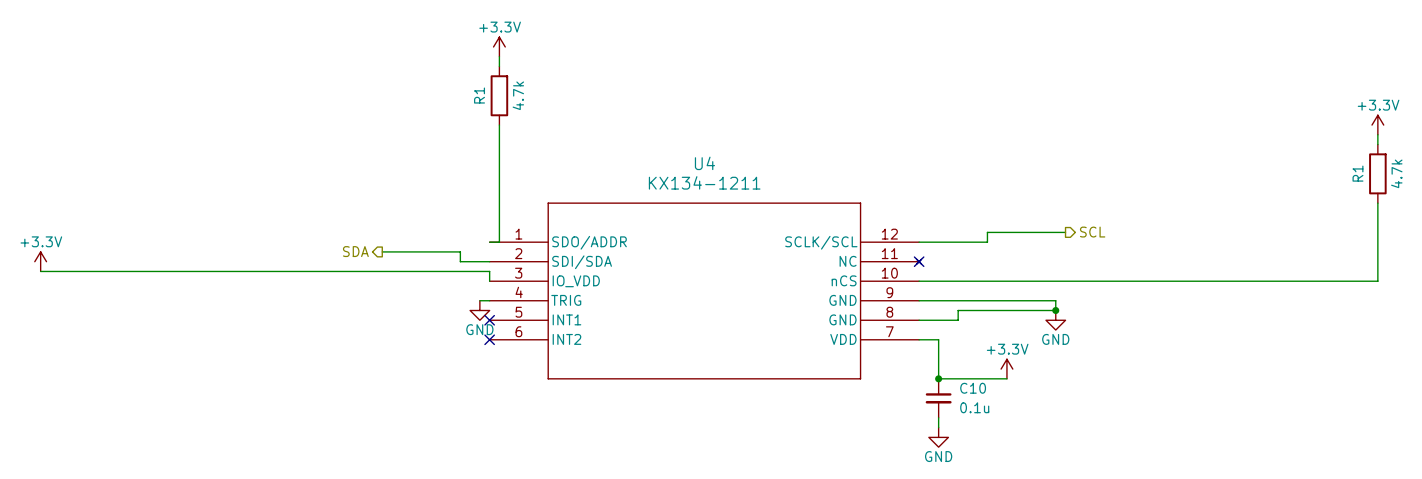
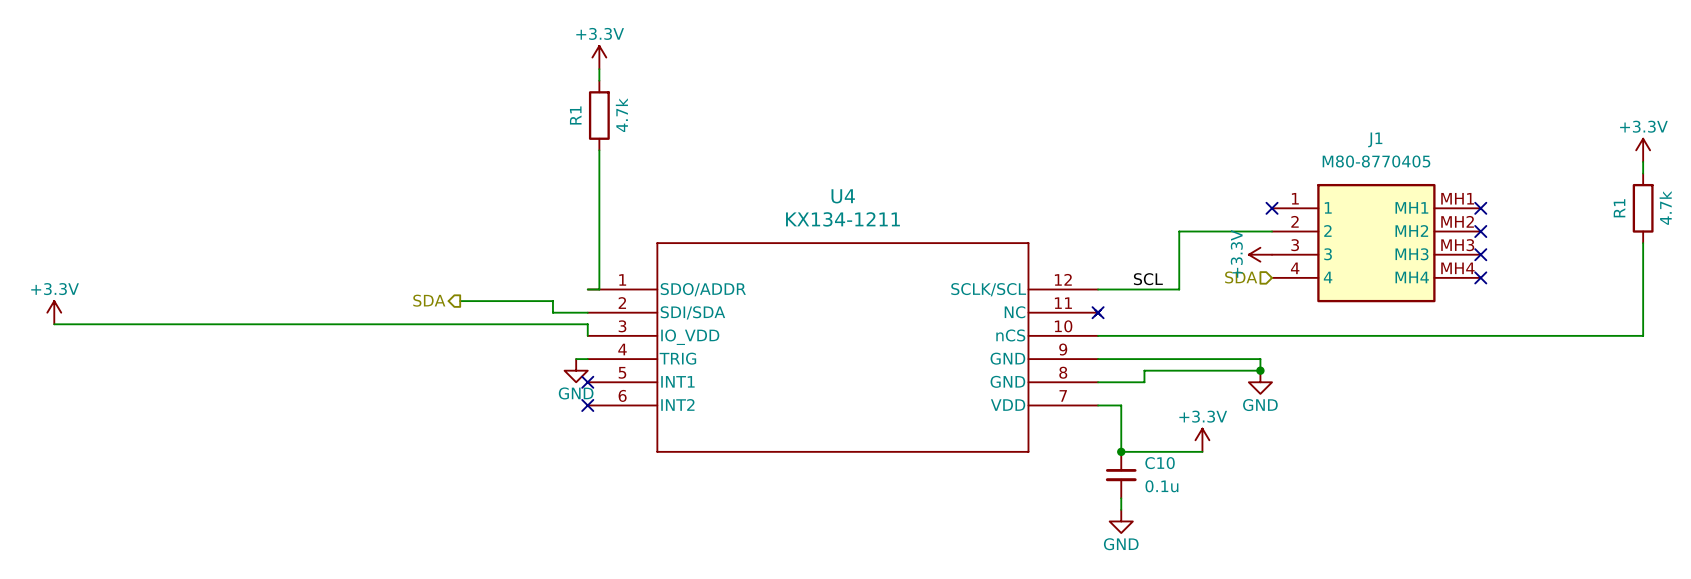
no-connect mark: none -> (1272, 208)
no-connect mark: none -> (1480, 208)
no-connect mark: none -> (1480, 231)
J1: none -> M80-8770405 (1376, 243)
power symbol: none -> +3.3V (1260, 254)
no-connect mark: none -> (1480, 254)
wire: (987, 232) (1065, 232) -> (1179, 277) (1179, 231) (1272, 231)
hierarchical label: none -> SDA (1241, 277)
hierarchical label: SCL (1092, 232) -> none
no-connect mark: none -> (1480, 277)
label: none -> SCL (1148, 279)

